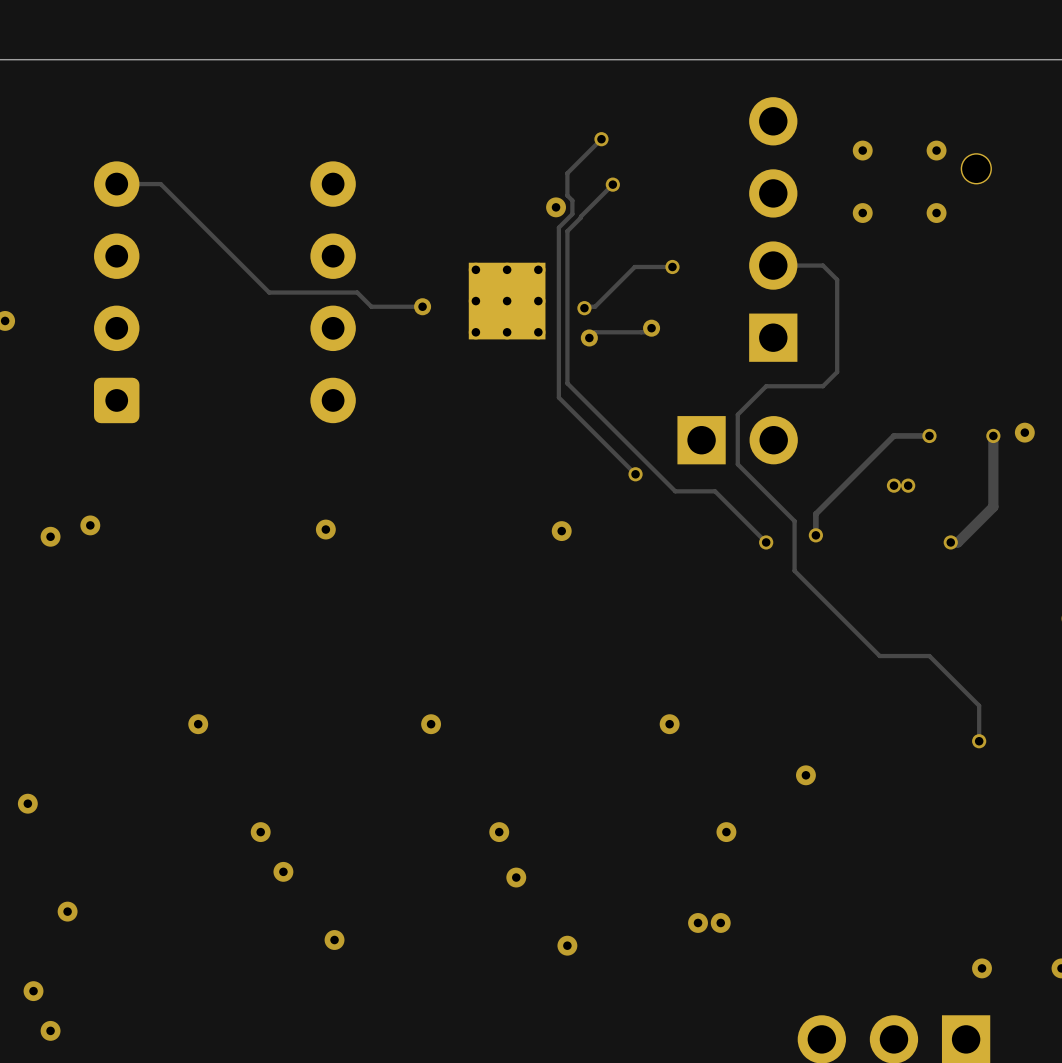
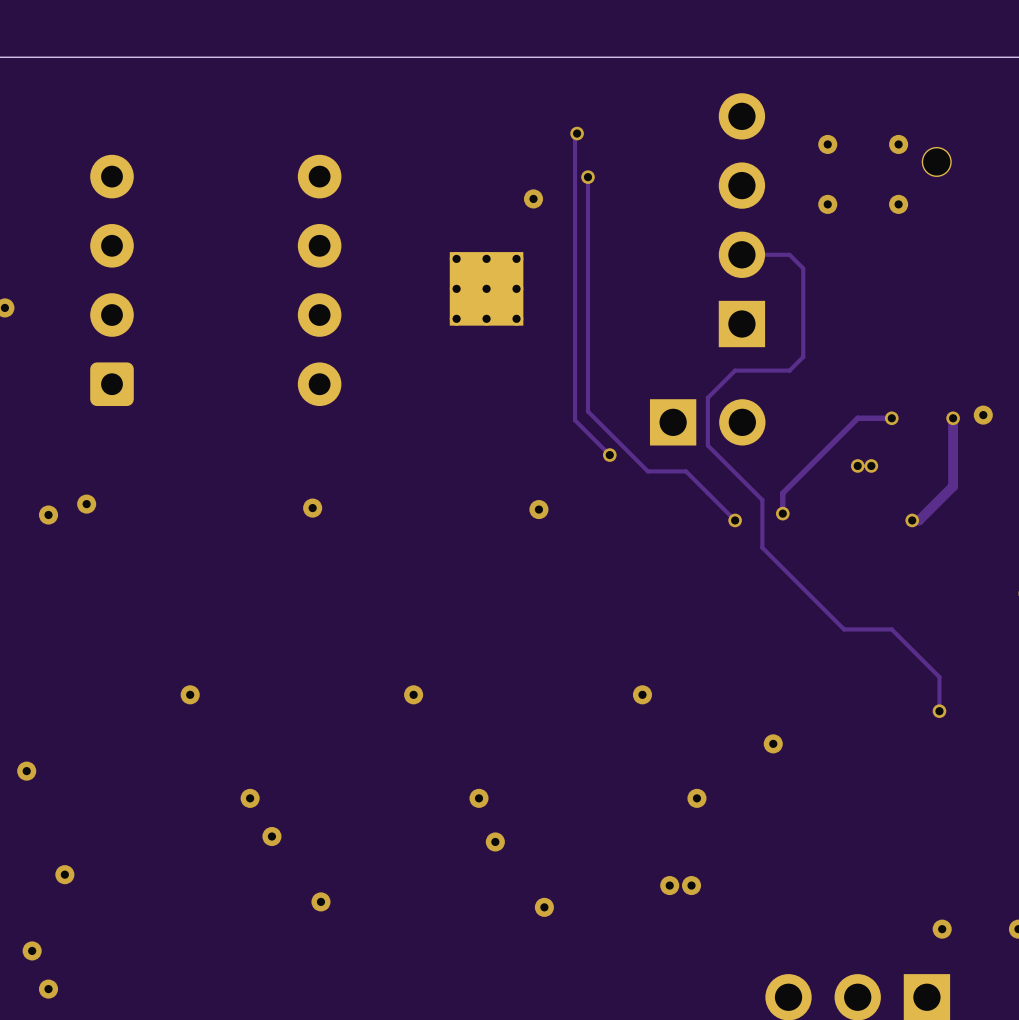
track: (599, 141) (567, 173) (567, 195) (572, 200) (572, 214) (558, 227) (558, 397) (599, 438) -> (575, 135) (575, 420)
track: (116, 184) (160, 184) (269, 292) (357, 292) (371, 306) (422, 306) -> none
track: (612, 184) (567, 231) (567, 383) (612, 428) -> (587, 177) (587, 411)
track: (672, 266) (634, 266) (595, 306) (584, 308) -> none
via: (672, 266) -> none
via: (422, 306) -> none
via: (584, 308) -> none
track: (651, 328) (647, 332) (595, 332) (589, 337) -> none
via: (651, 328) -> none
via: (589, 337) -> none

